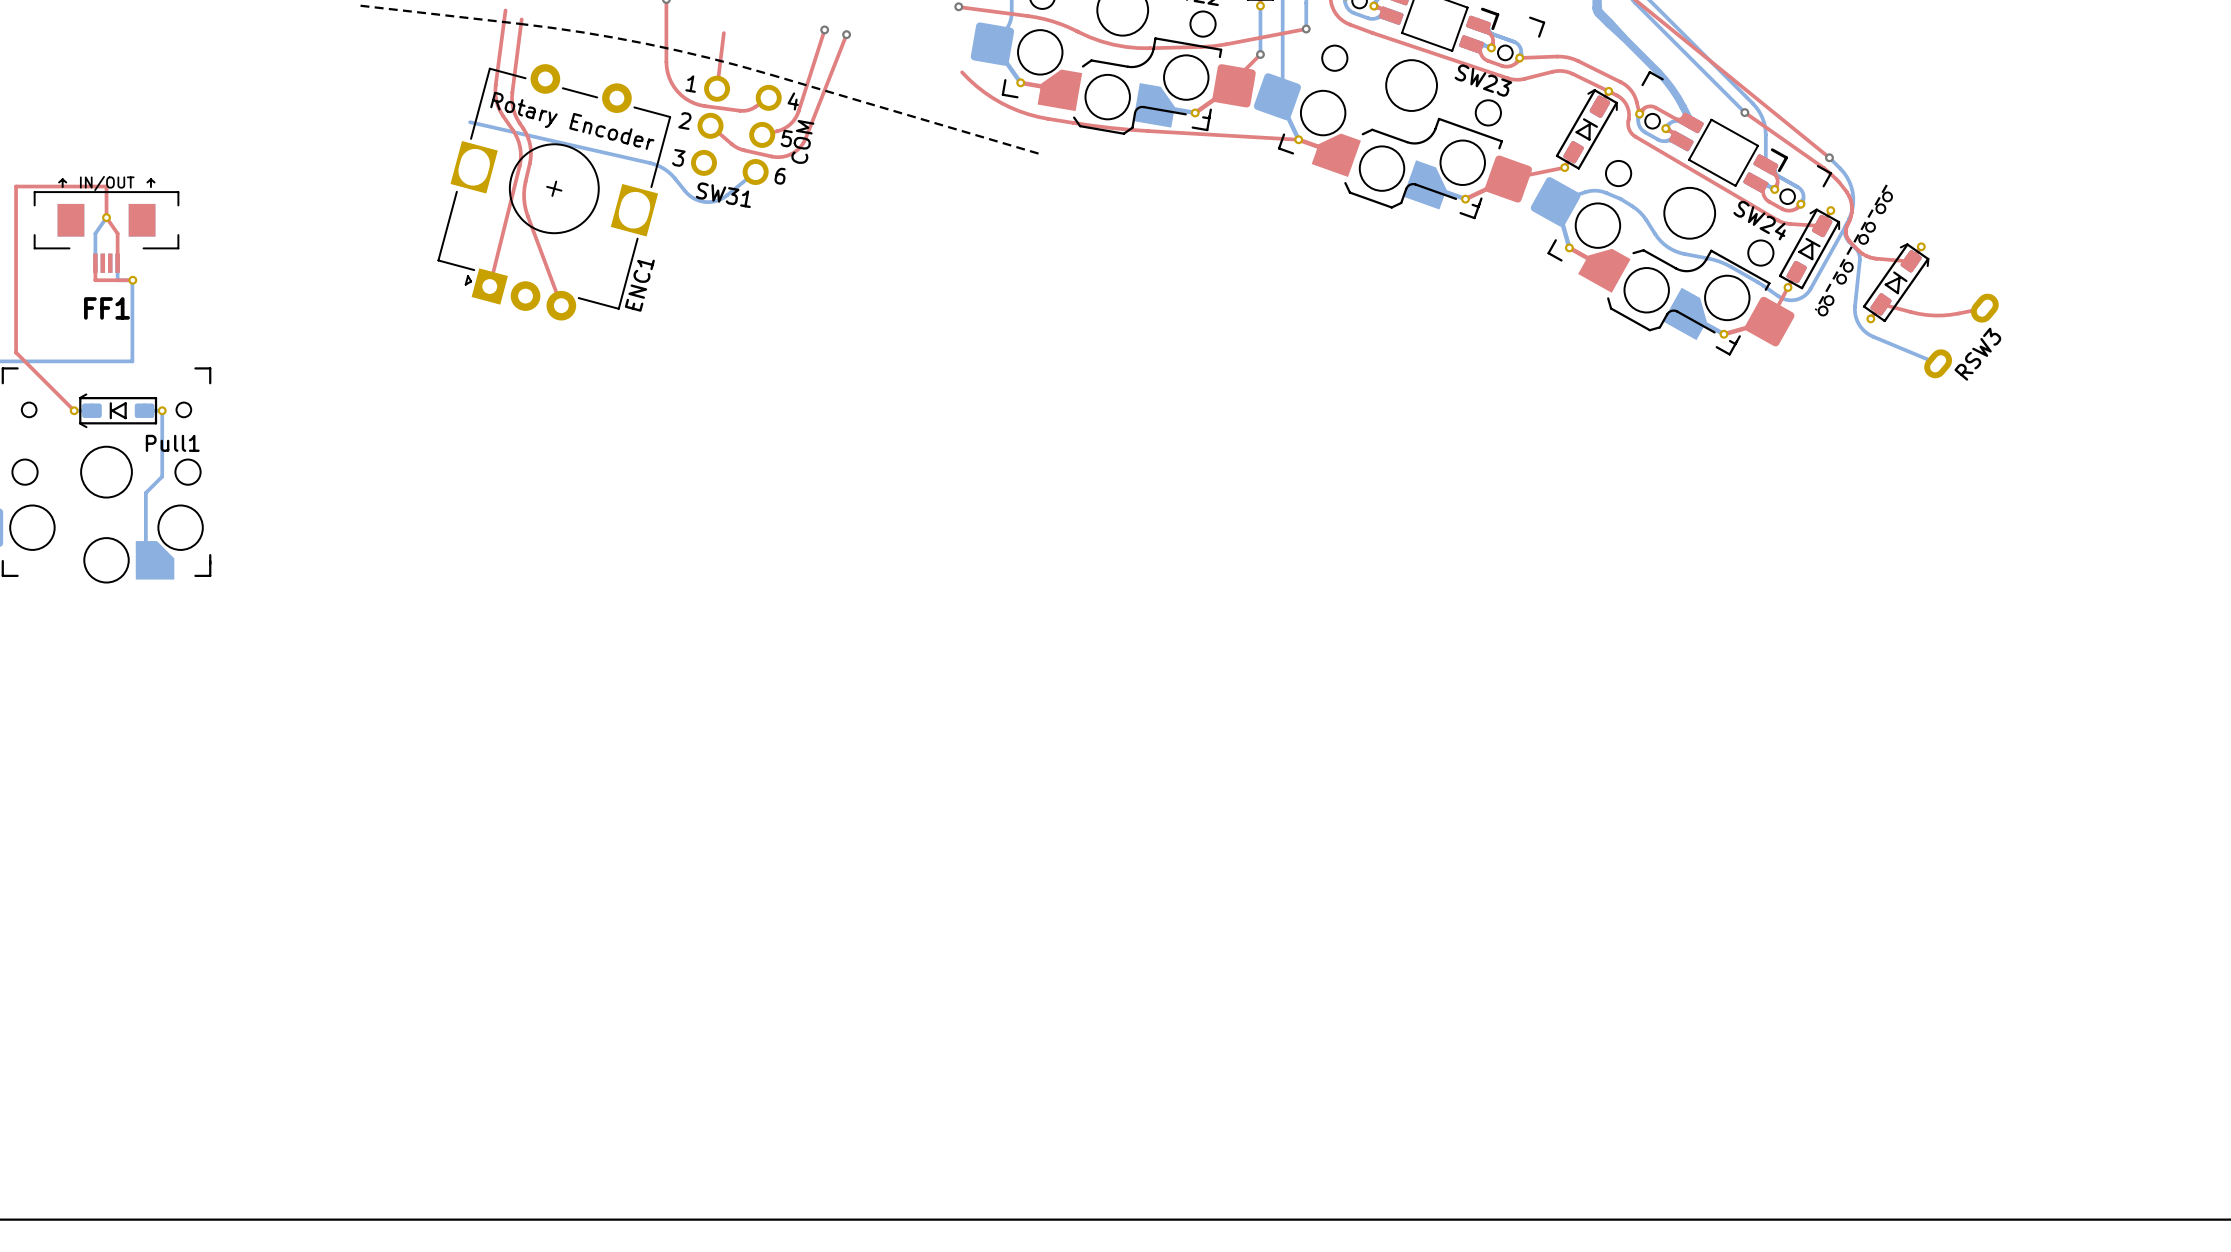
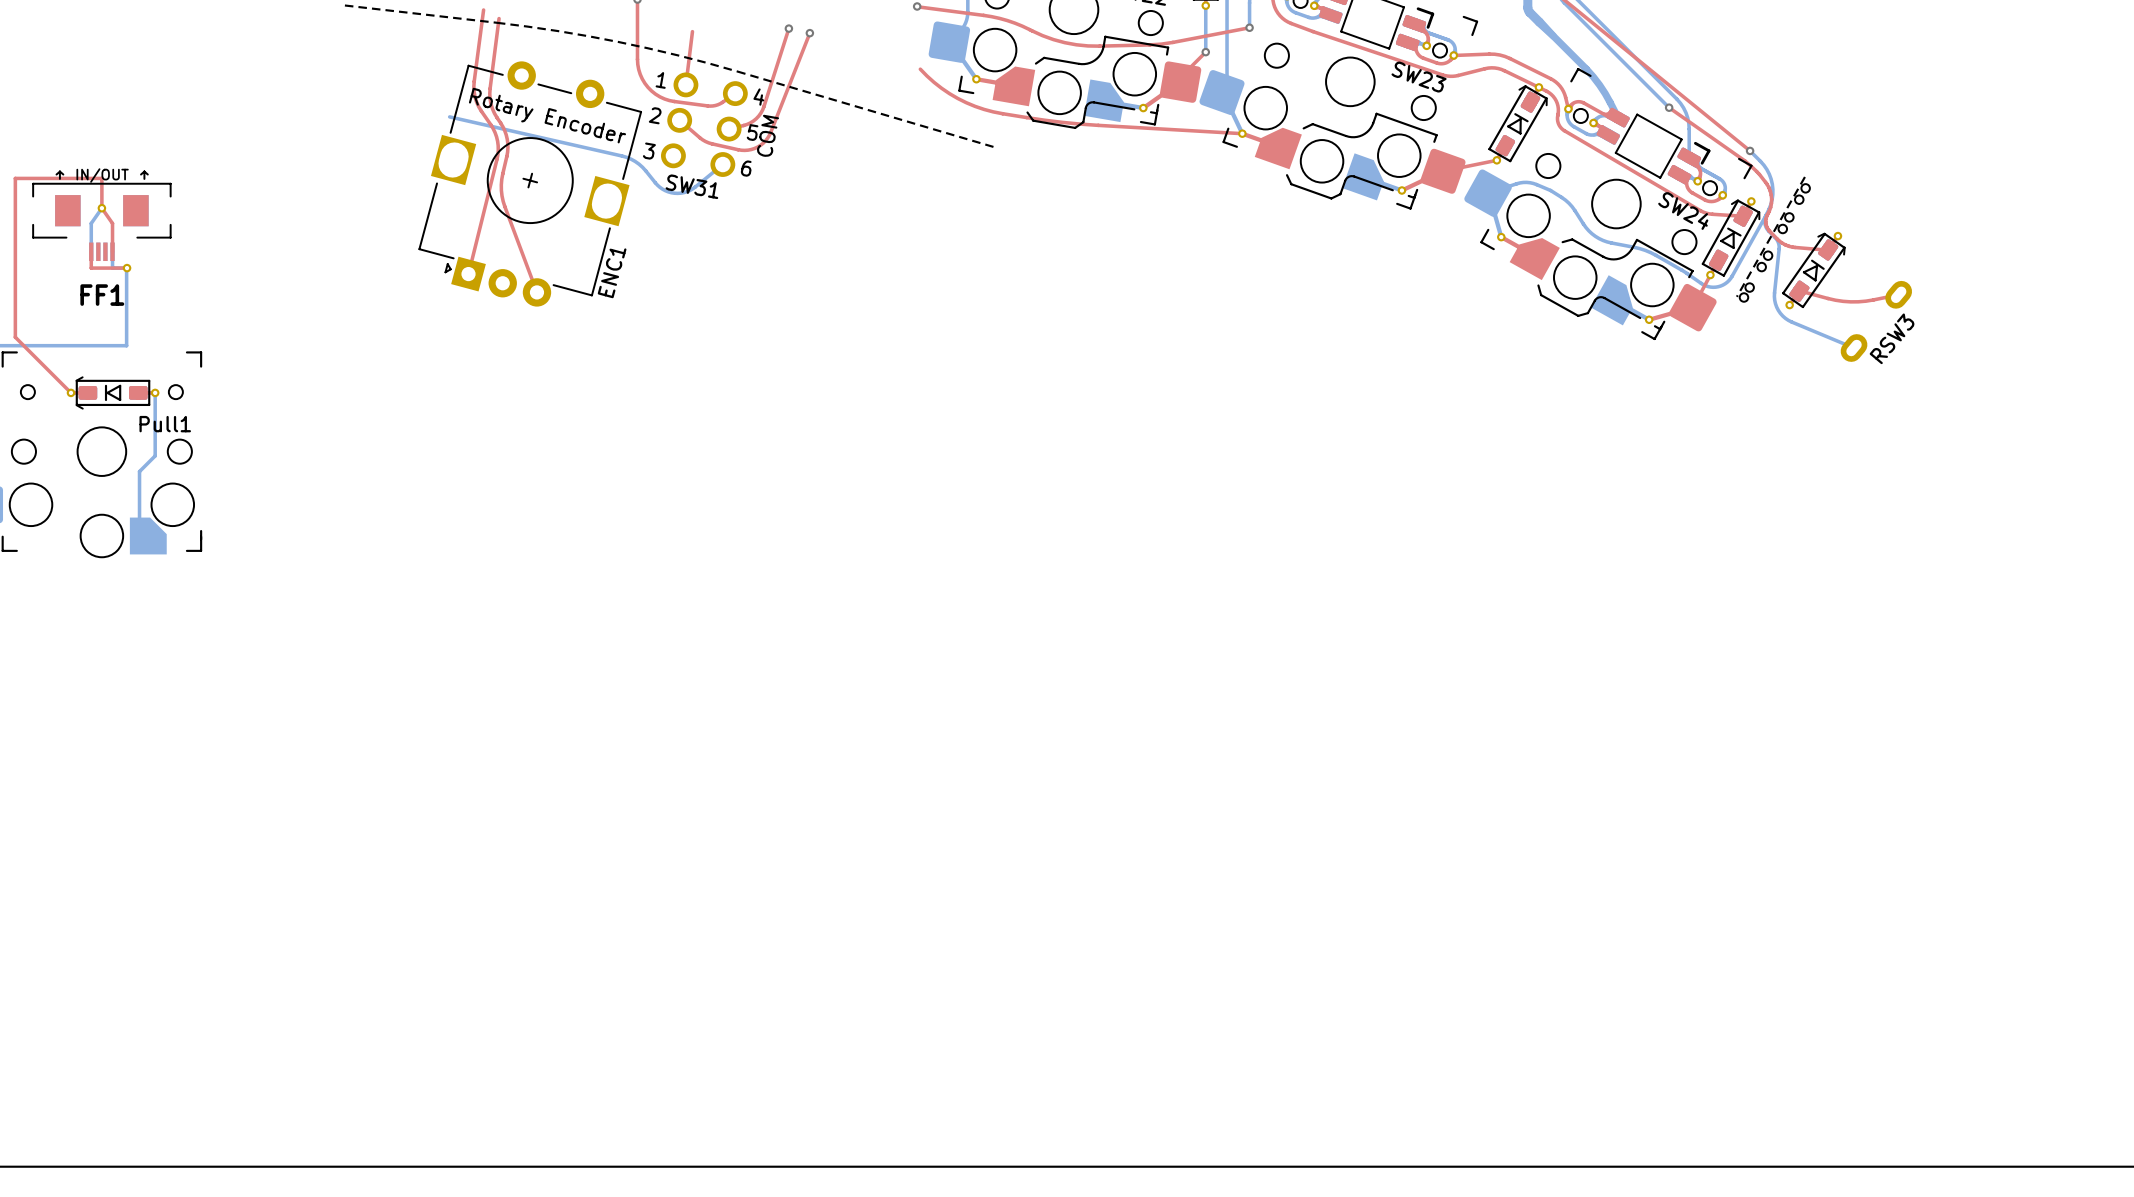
part footprint: [69, 393, 167, 428] -> [66, 376, 160, 410]

